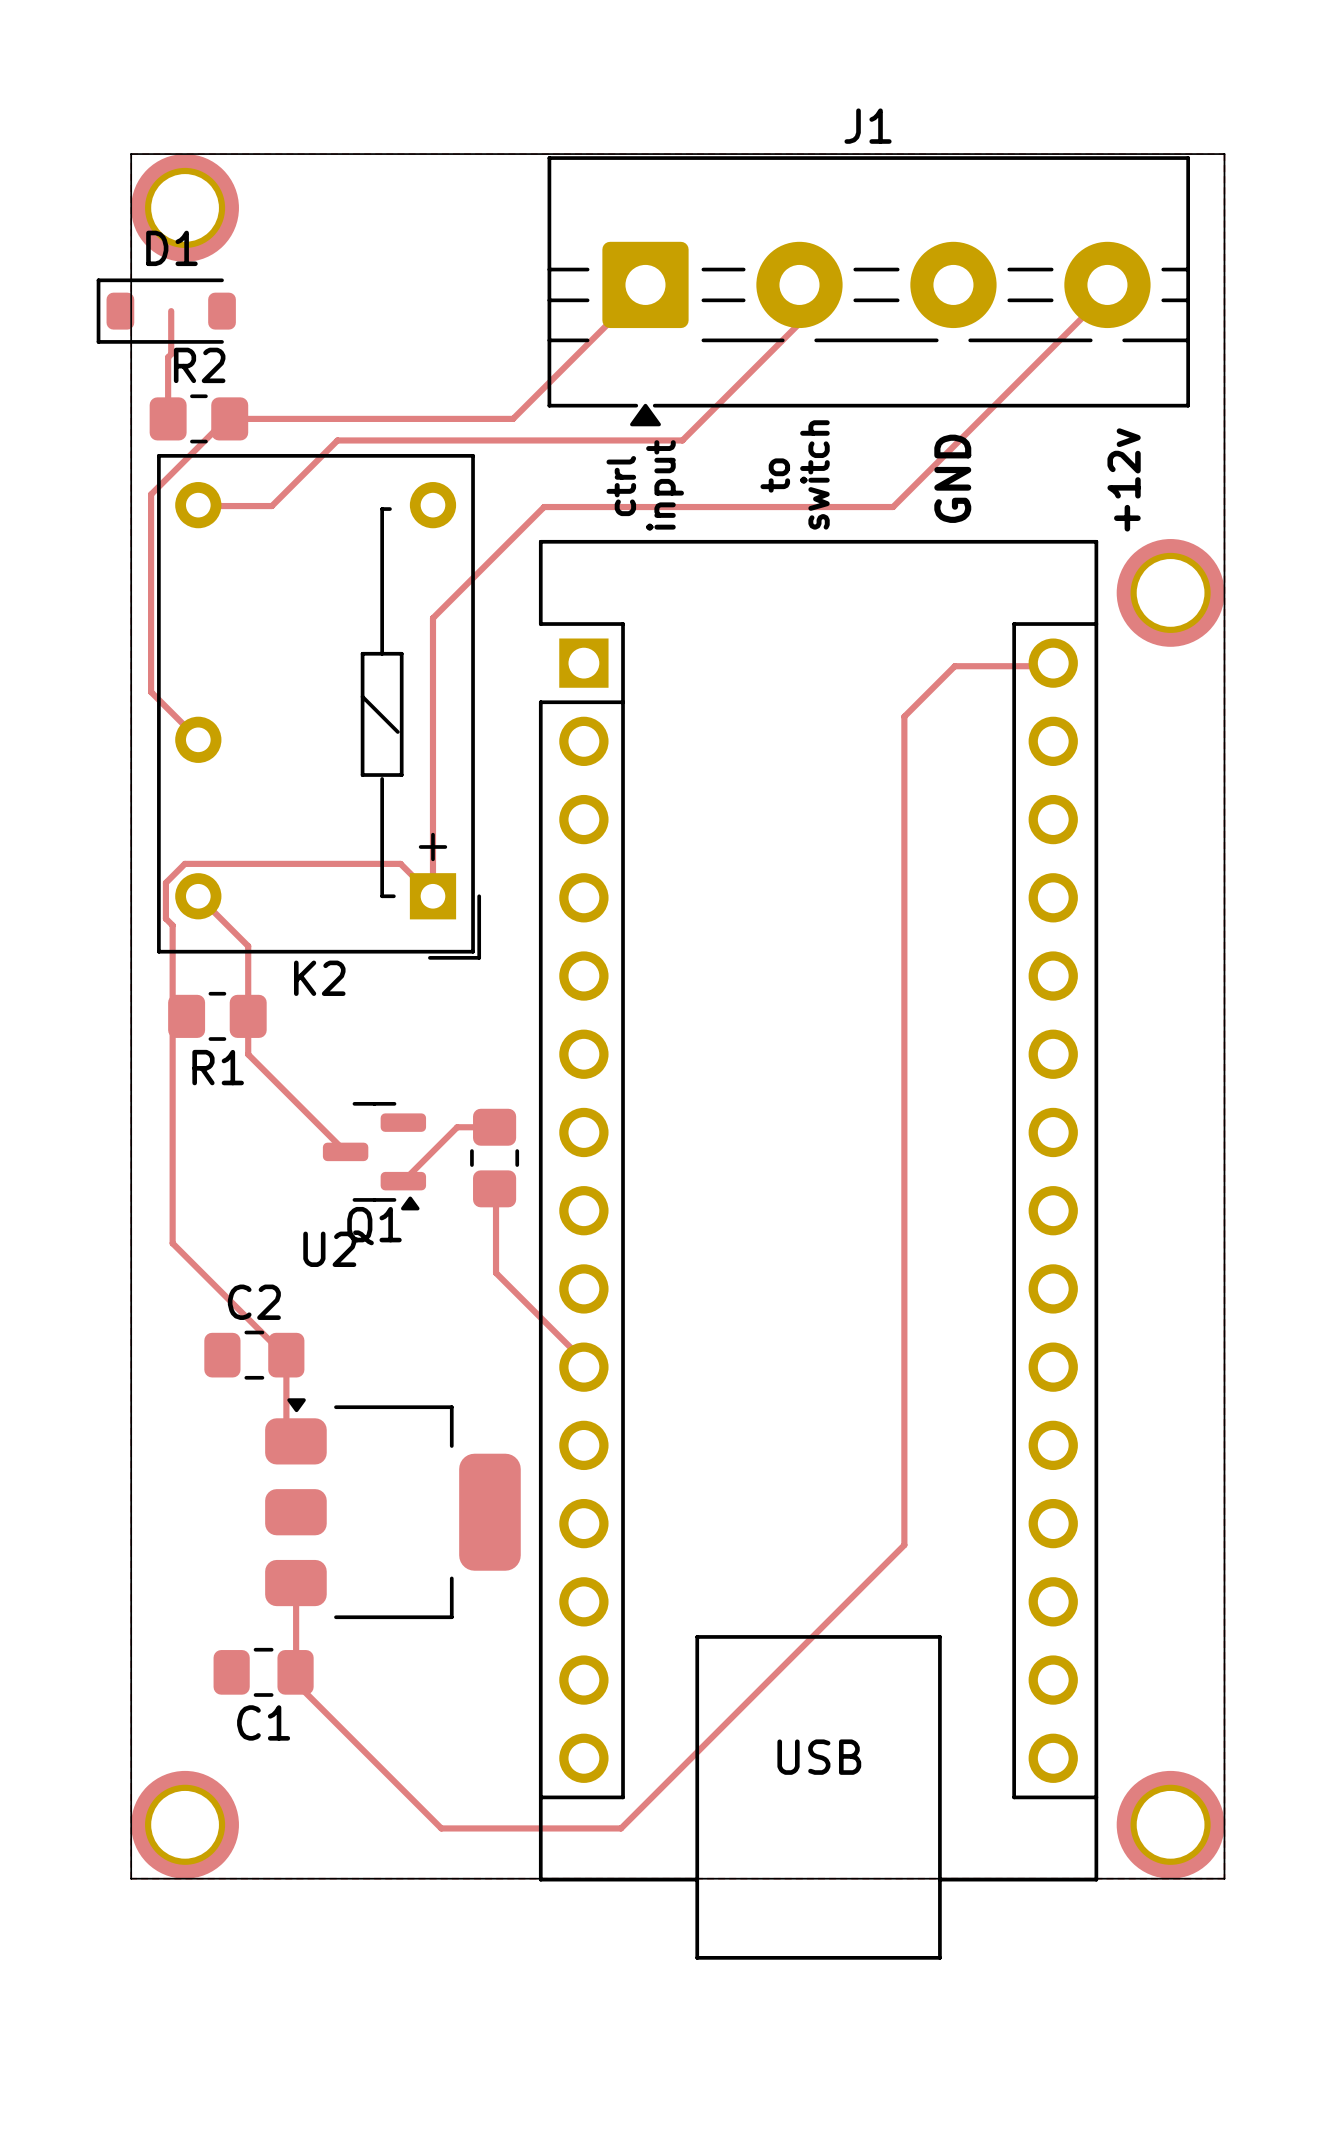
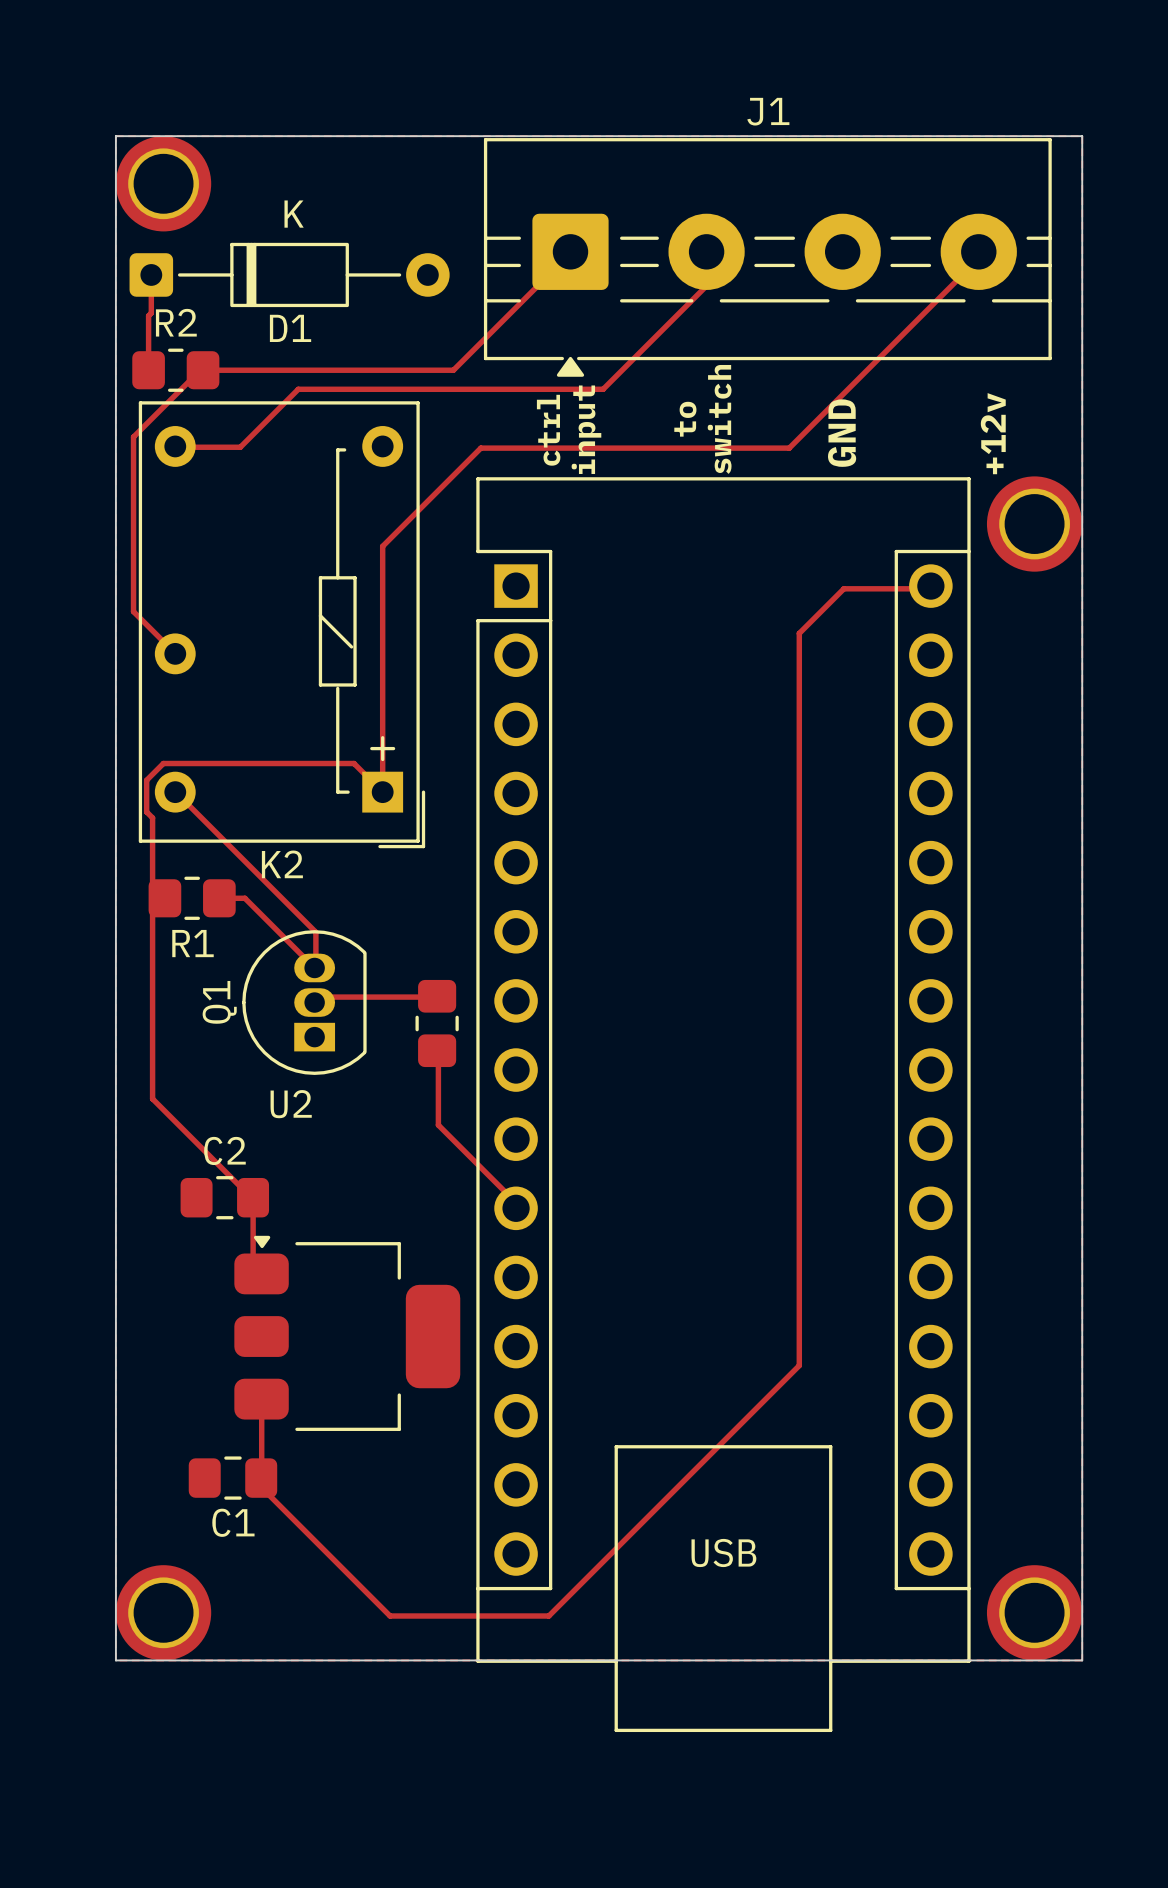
D1 name position: D1 (171, 248) -> D1 (290, 328)
D1 footprint: [96, 278, 236, 344] -> [129, 242, 450, 308]
track: (198, 896) (248, 946) (248, 1054) (345, 1151) -> none
track: none -> (176, 792) (315, 932) (315, 968)
track: none -> (219, 898) (244, 898) (314, 967)
Q1 footprint: [322, 1101, 427, 1211] -> [242, 930, 367, 1075]
track: (494, 1127) (457, 1127) (403, 1181) -> none
track: none -> (438, 997) (322, 997) (317, 1001) (317, 1010) (315, 1003)
Q1 name position: Q1 (374, 1226) -> Q1 (219, 1002)

